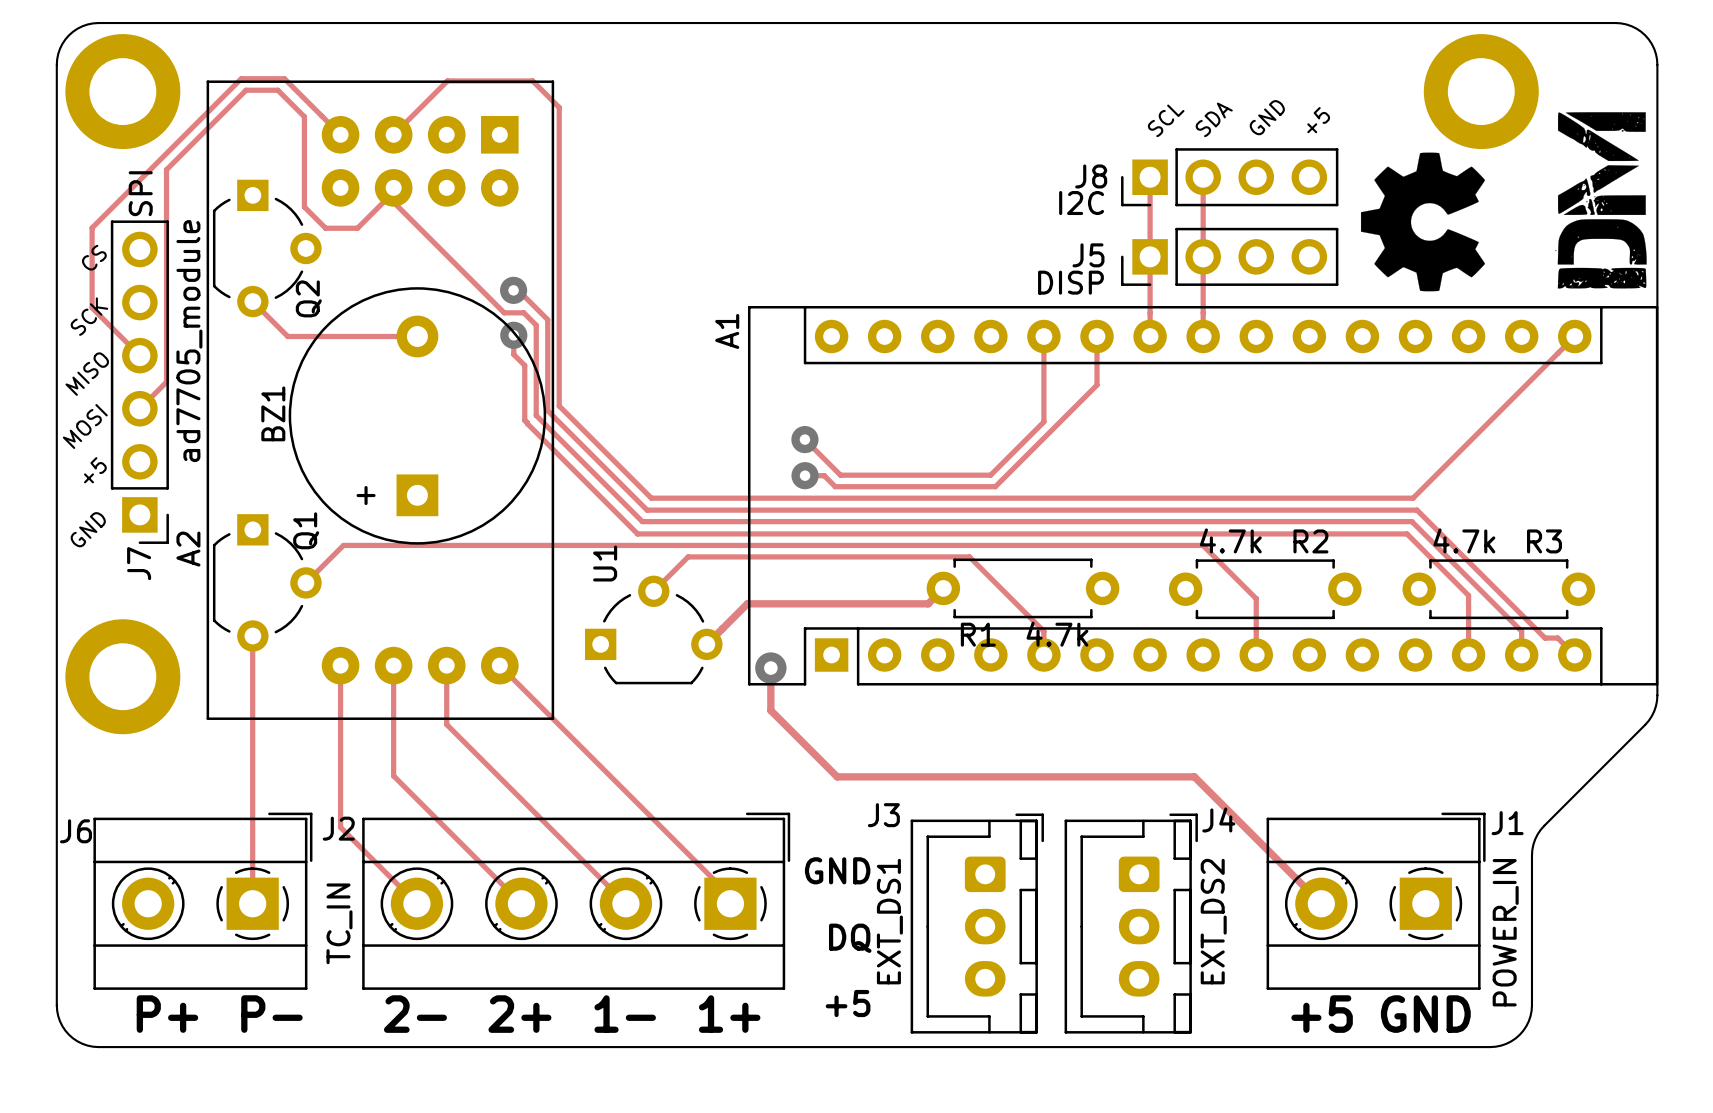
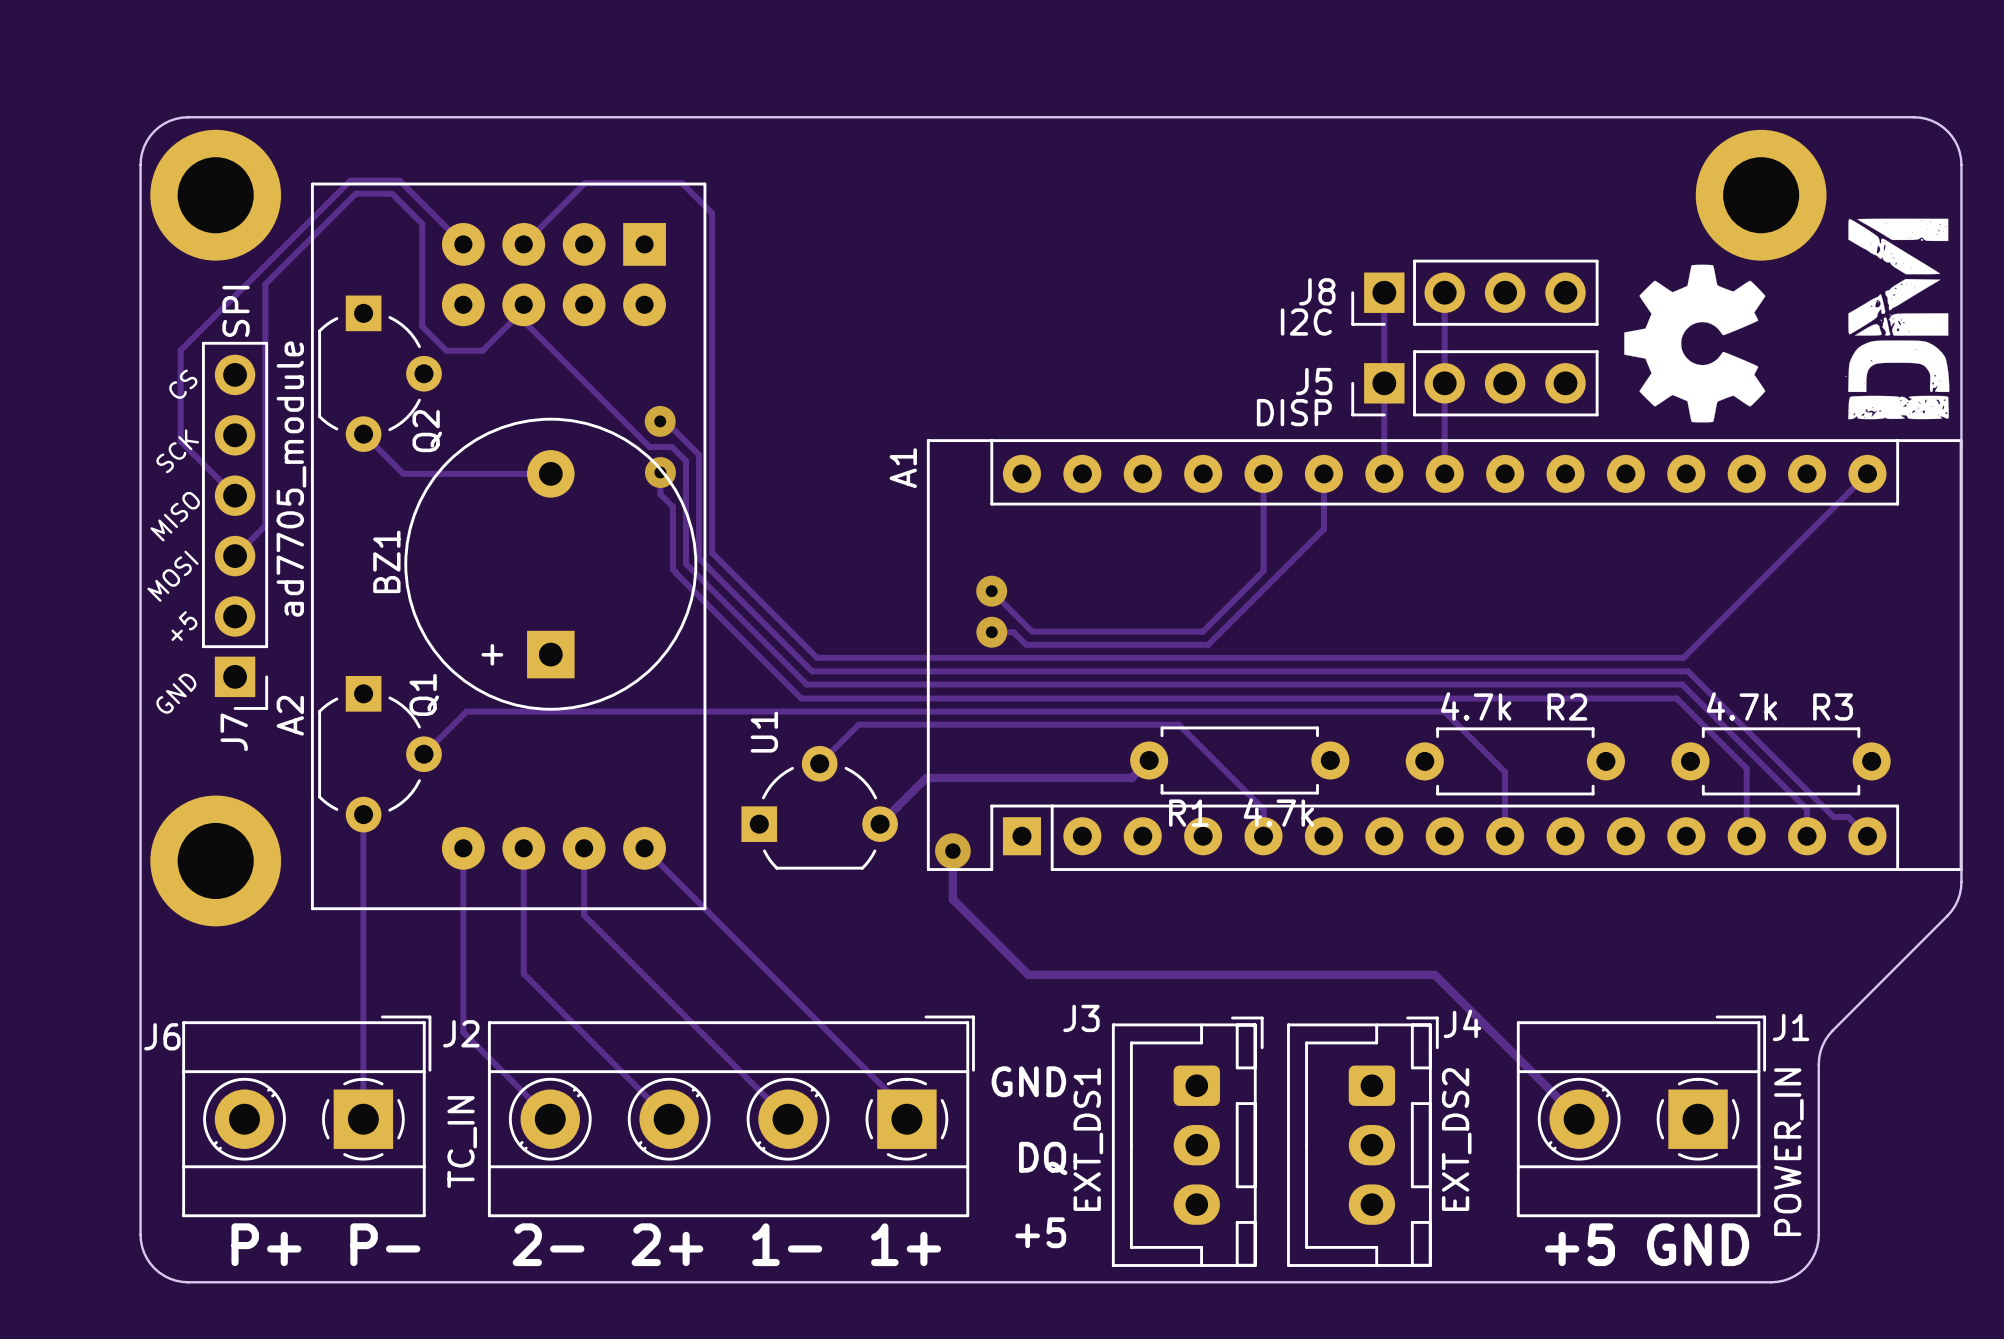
text: GND (1267, 117) -> none
text: SDA (1214, 119) -> none
text: SCL (1166, 120) -> none
text: +5 (1318, 120) -> none

